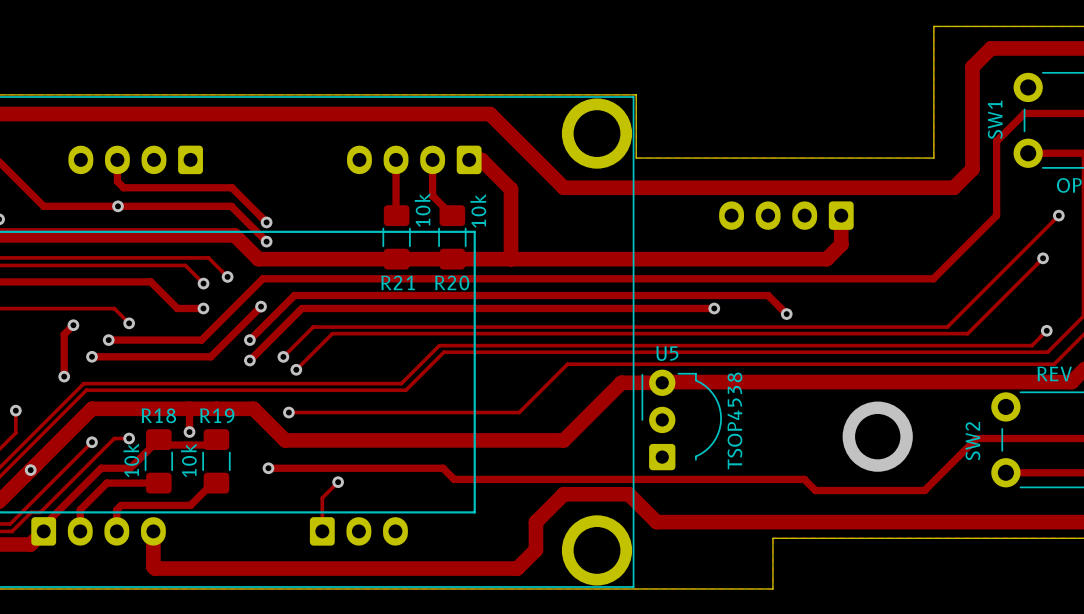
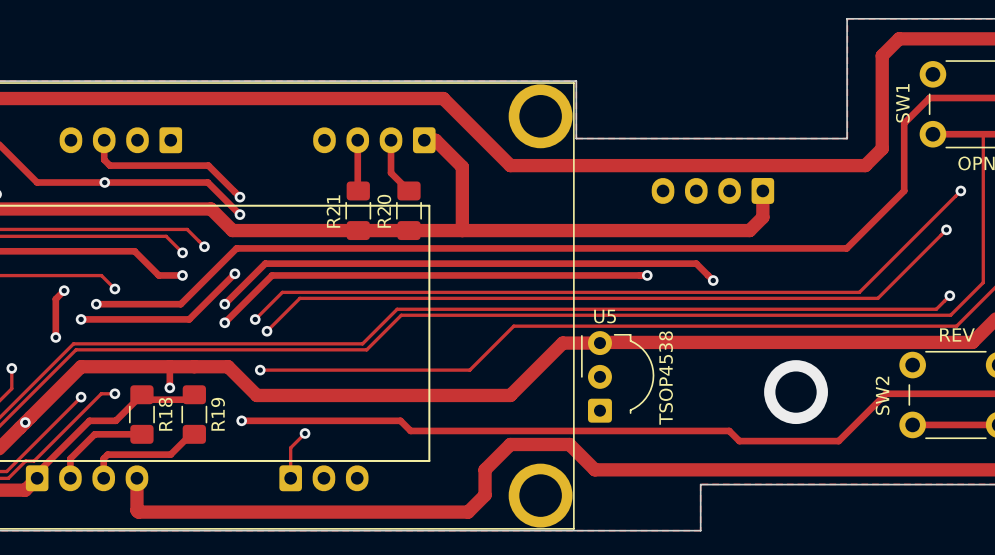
R21 value: 10k (422, 210) -> none
R20 value: 10k (478, 210) -> none
R21 name rotation: 0° (398, 282) -> 90° counterclockwise (333, 211)
R21 name position: R21 (398, 282) -> R21 (333, 211)
R20 name rotation: 0° (452, 282) -> 90° counterclockwise (384, 211)
R20 name position: R20 (452, 282) -> R20 (384, 211)
R18 name rotation: 0° (158, 415) -> 90° counterclockwise (165, 414)
R18 name position: R18 (158, 415) -> R18 (165, 414)
R19 name rotation: 0° (217, 415) -> 90° counterclockwise (218, 414)
R19 name position: R19 (217, 415) -> R19 (218, 414)
R18 value: 10k (131, 460) -> none
R19 value: 10k (188, 460) -> none

